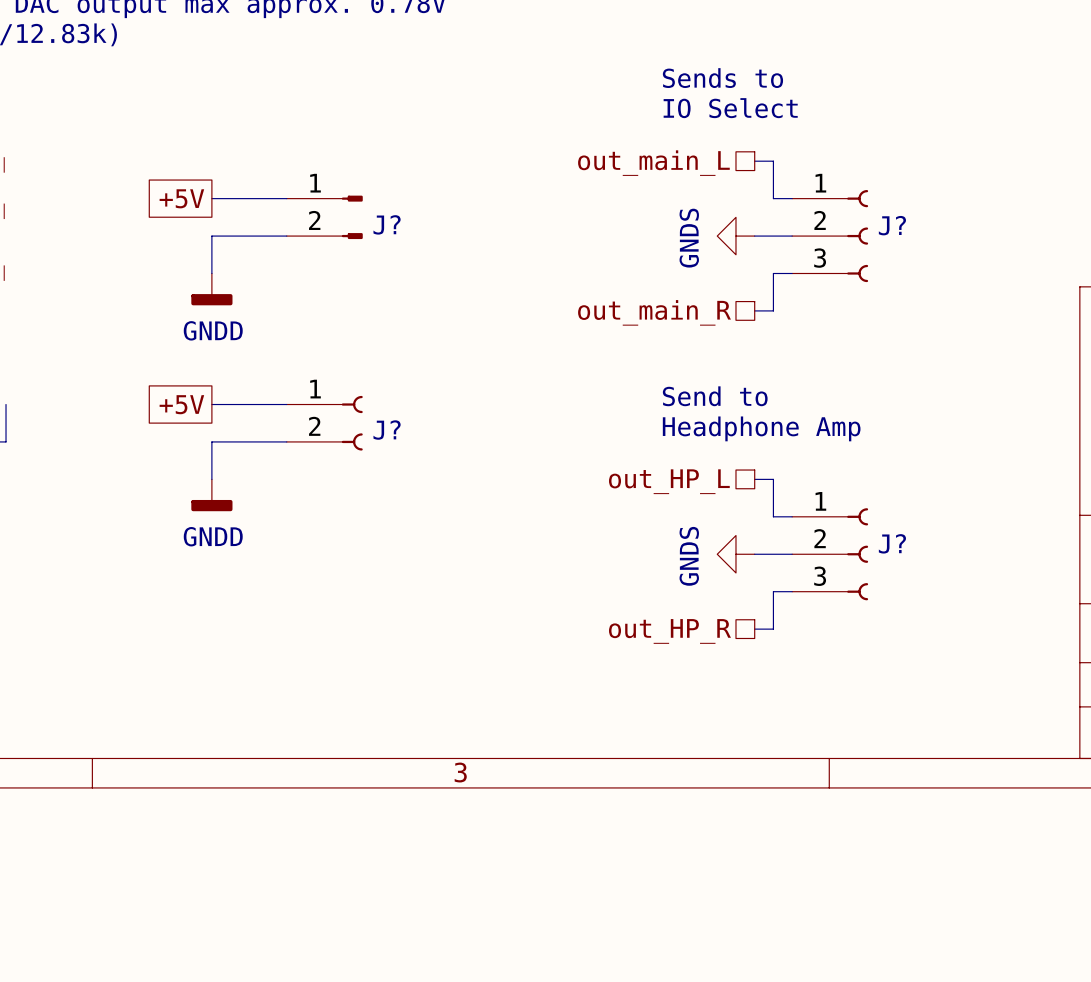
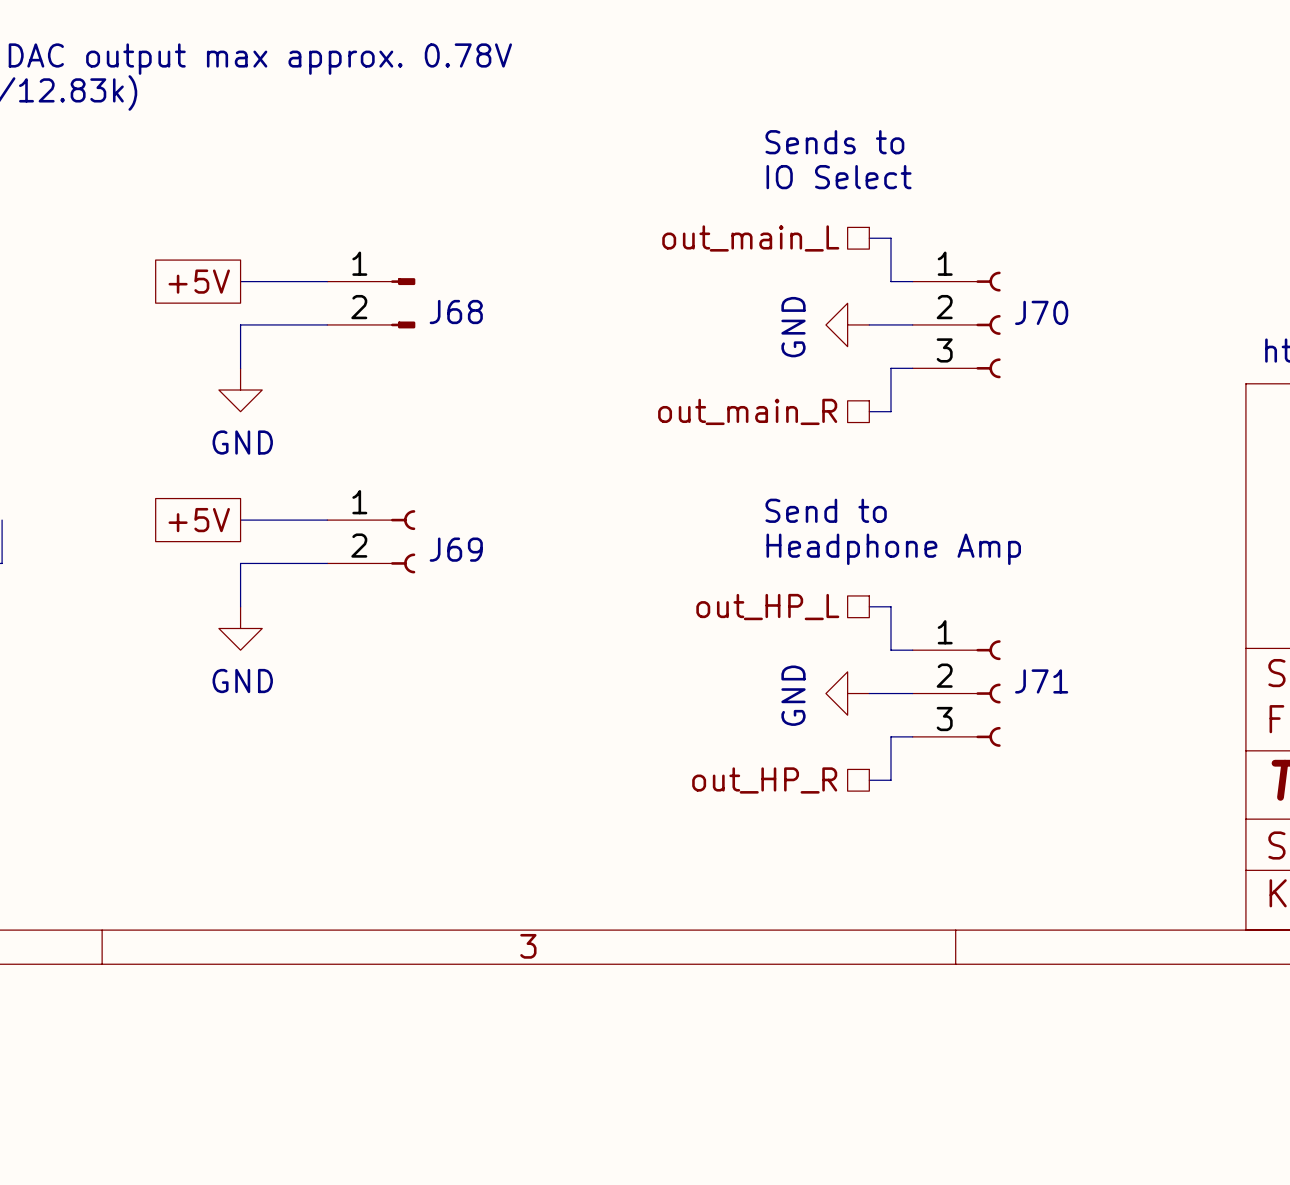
J? name: J? (387, 224) -> J68 (456, 312)
J? name: J? (892, 225) -> J70 (1041, 312)
power symbol: GNDS (735, 236) -> GND (847, 324)
power symbol: GNDD (211, 289) -> GND (240, 390)
J? name: J? (387, 430) -> J69 (456, 549)
power symbol: GNDD (211, 495) -> GND (240, 628)
J? name: J? (892, 543) -> J71 (1041, 681)
power symbol: GNDS (735, 554) -> GND (847, 693)

